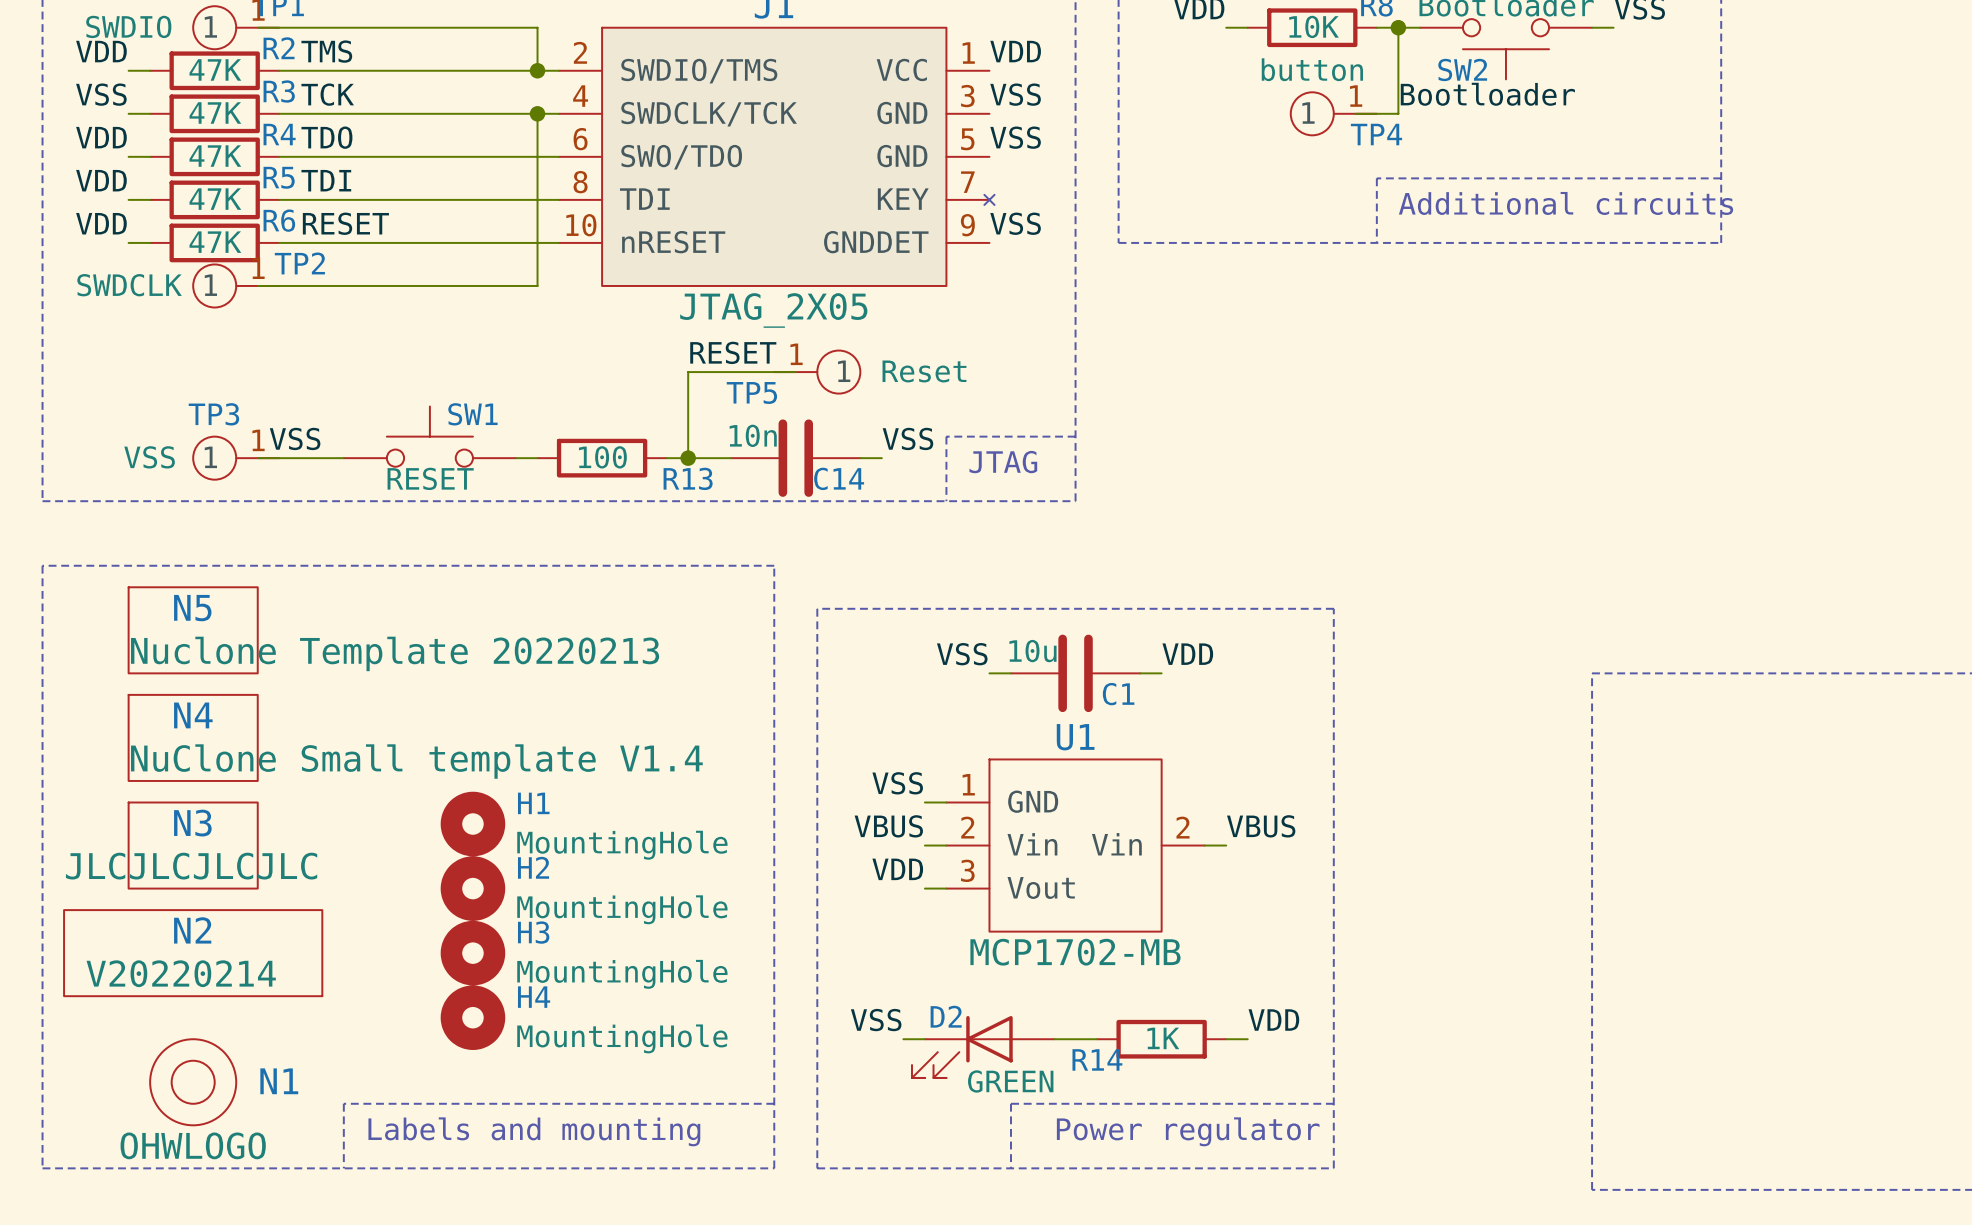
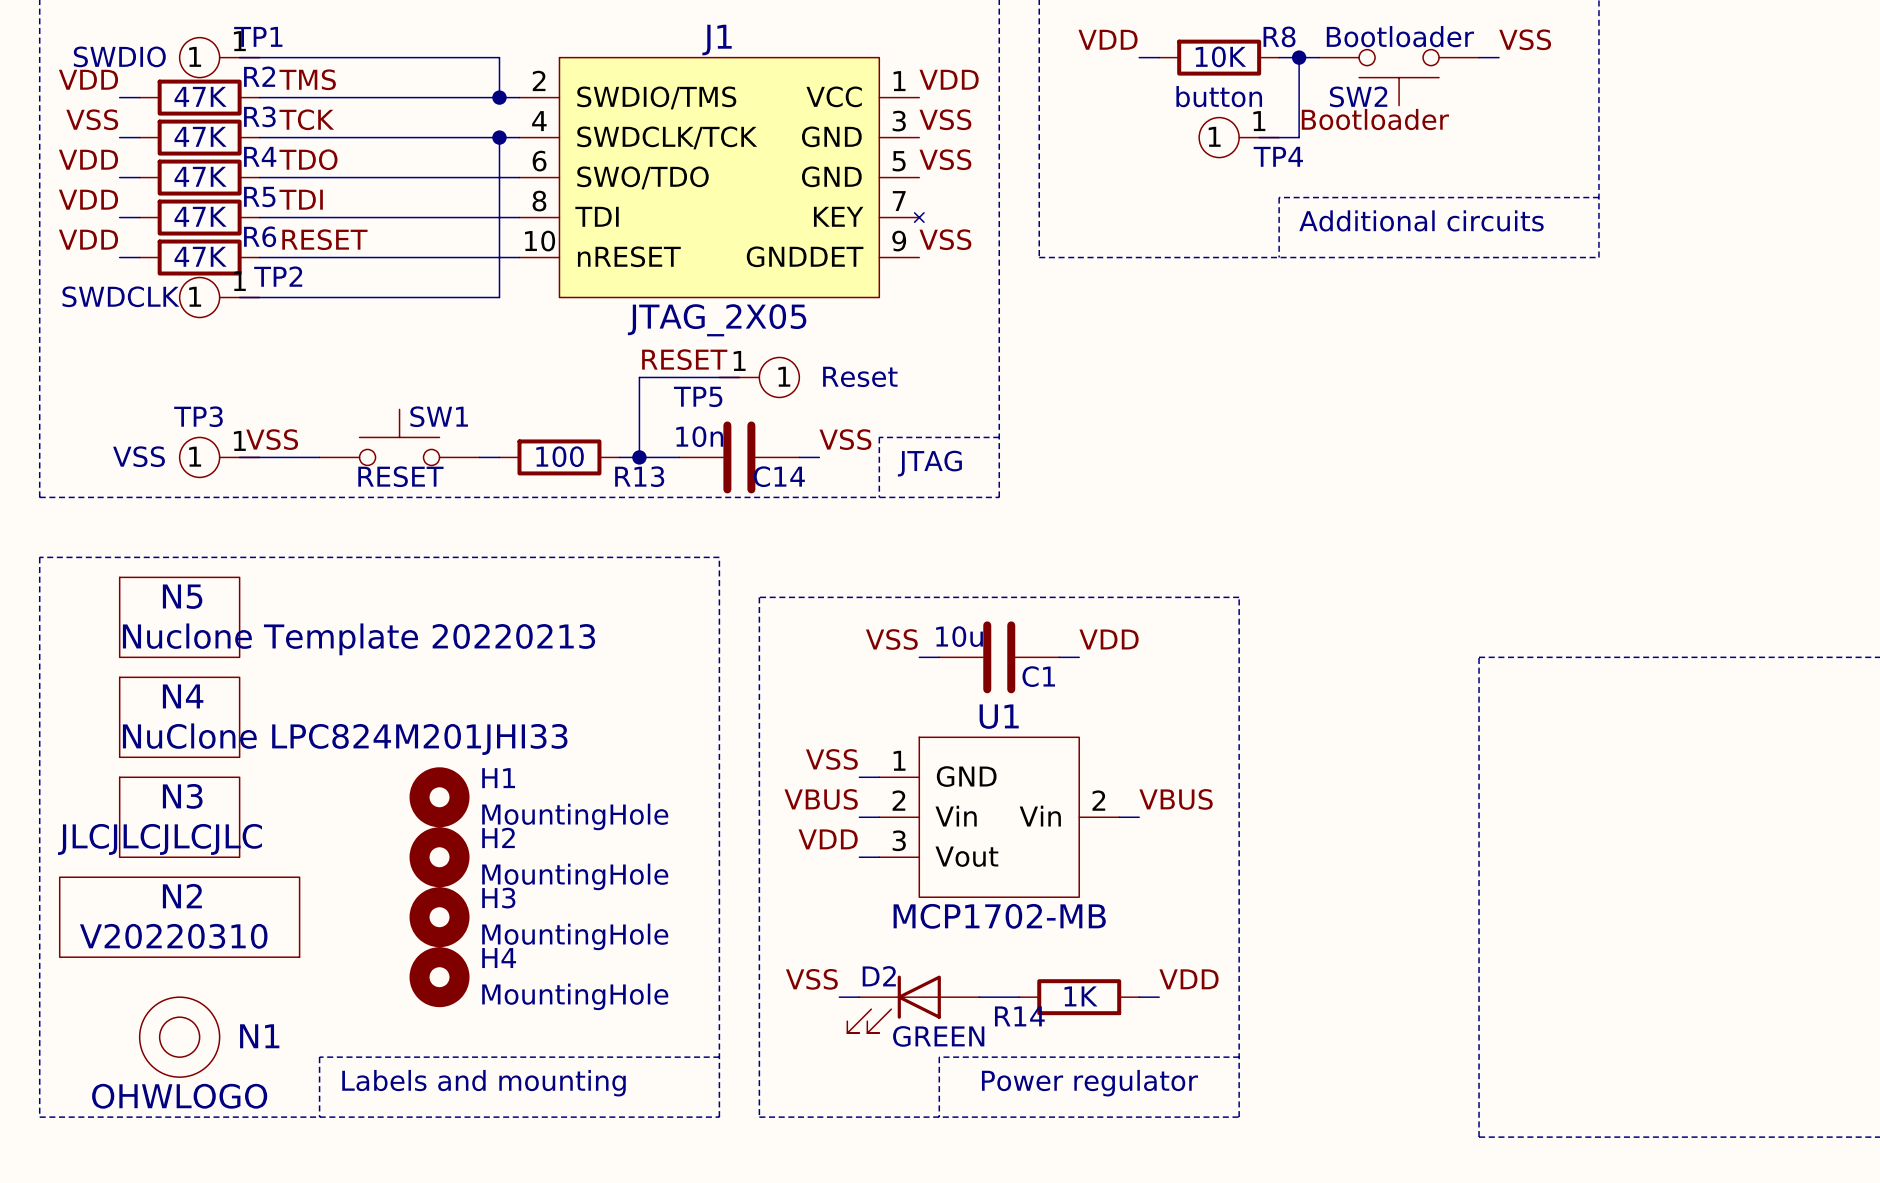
N4 value: NuClone Small template V1.4 (416, 761) -> NuClone LPC824M201JHI33 (345, 739)
N2 value: V20220214 (181, 973) -> V20220310 (173, 936)

